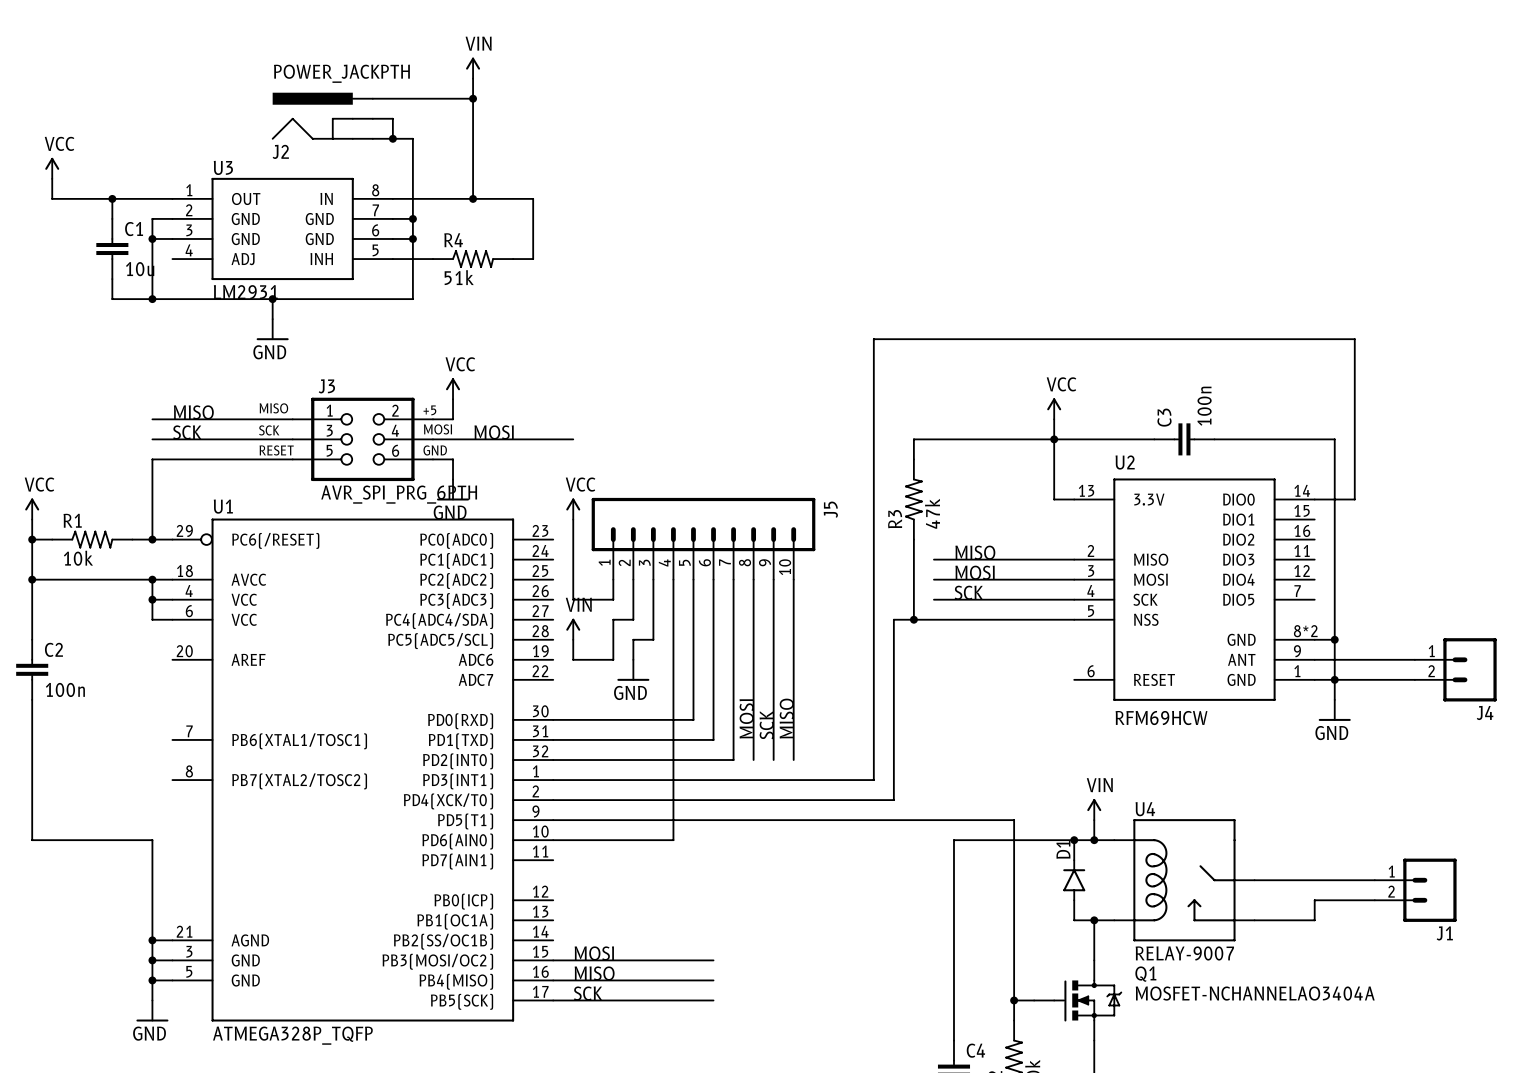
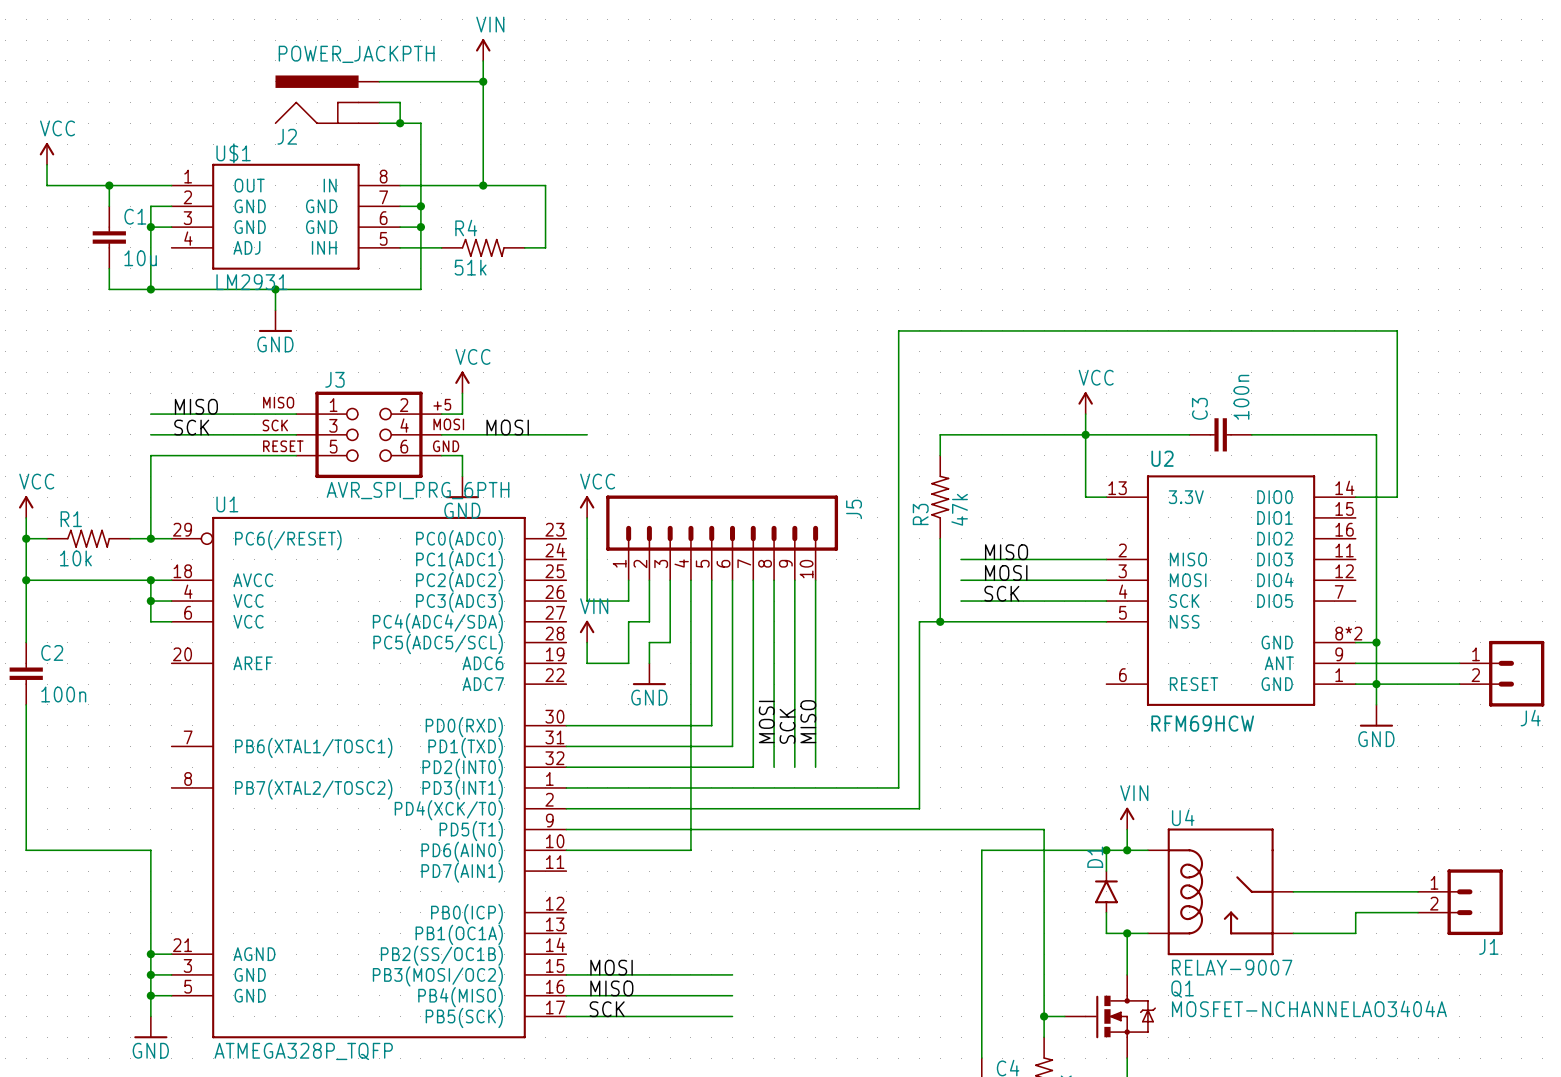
U3 name: U3 (223, 167) -> U$1 (233, 153)

